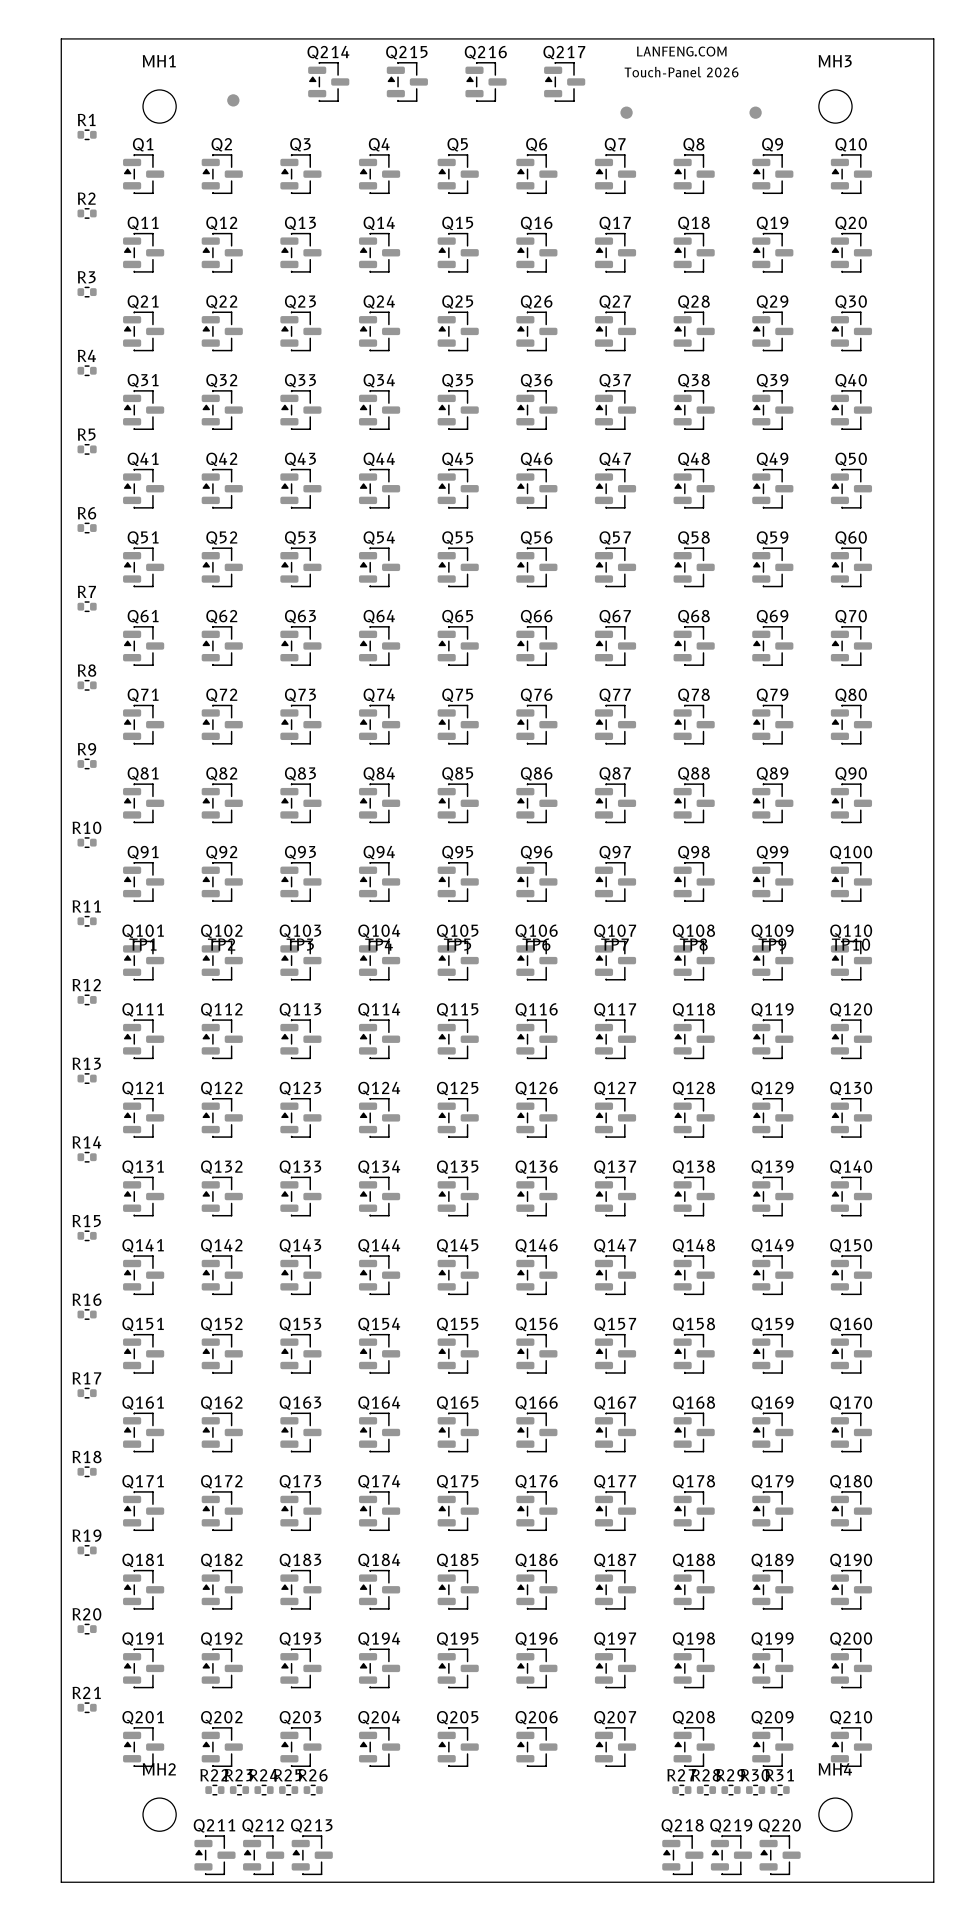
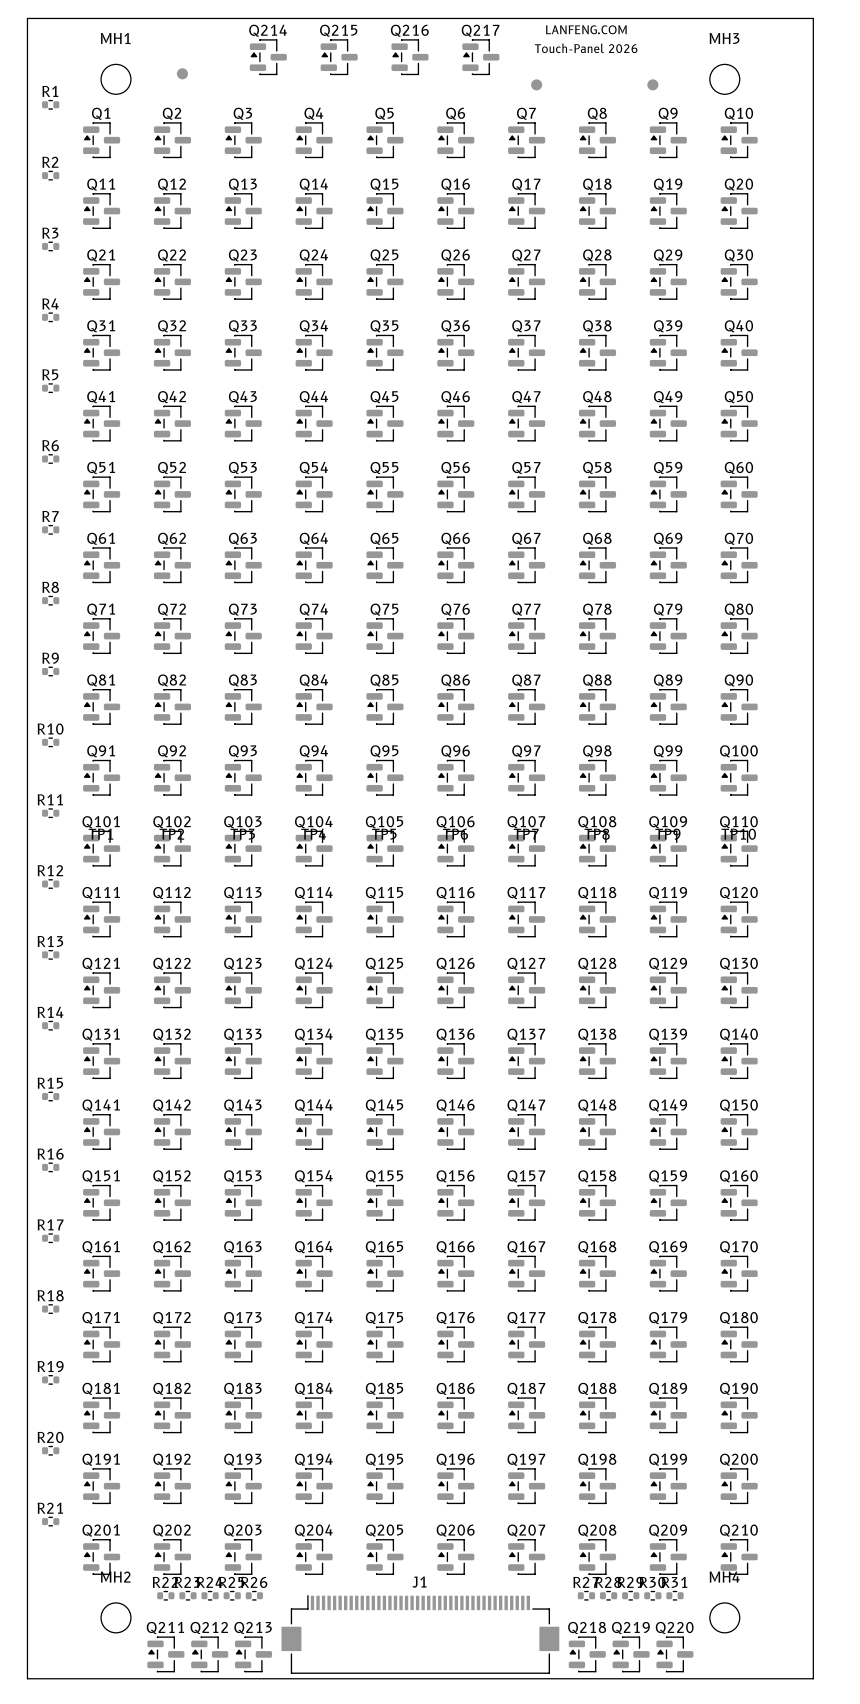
J1: none -> (420, 1634)

